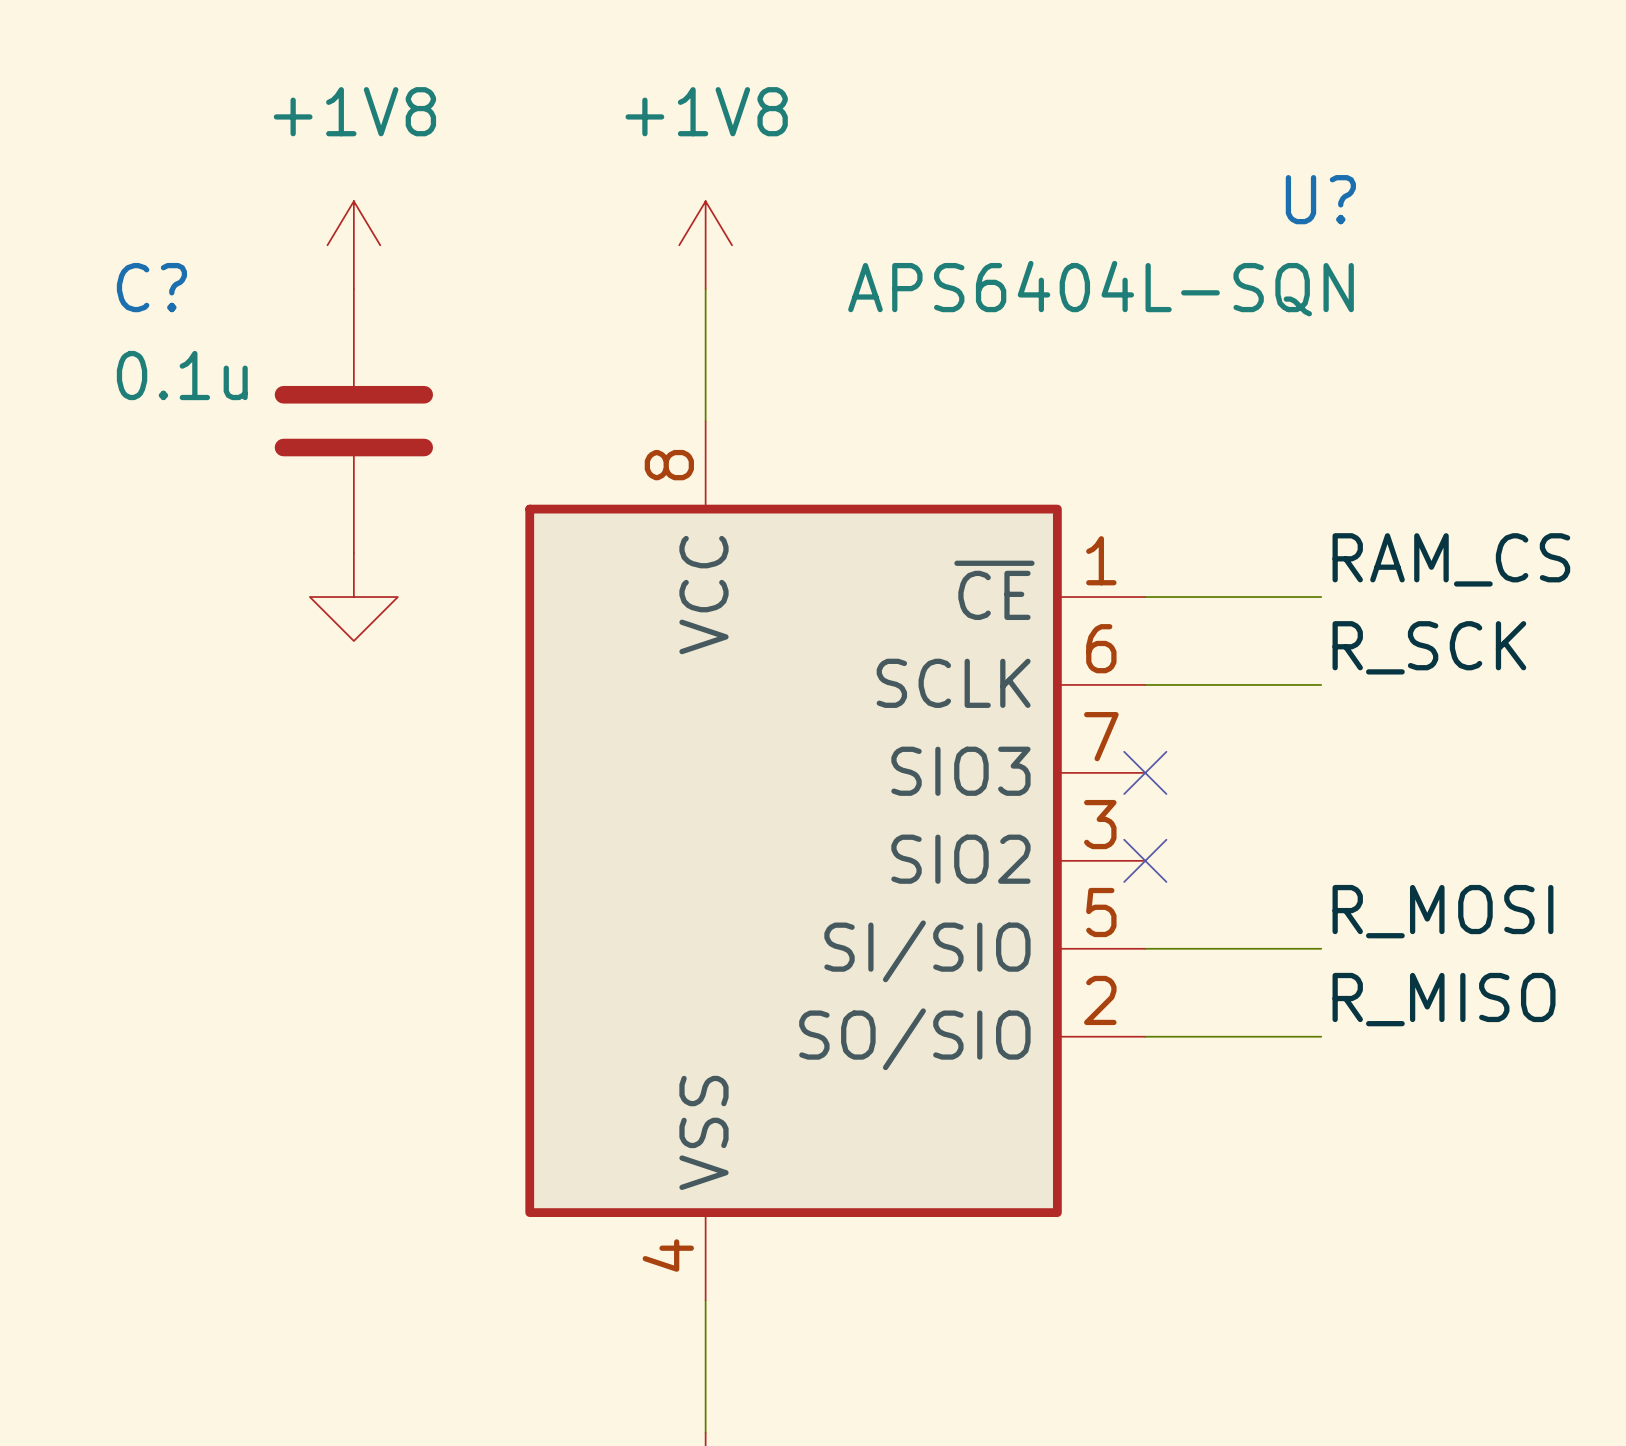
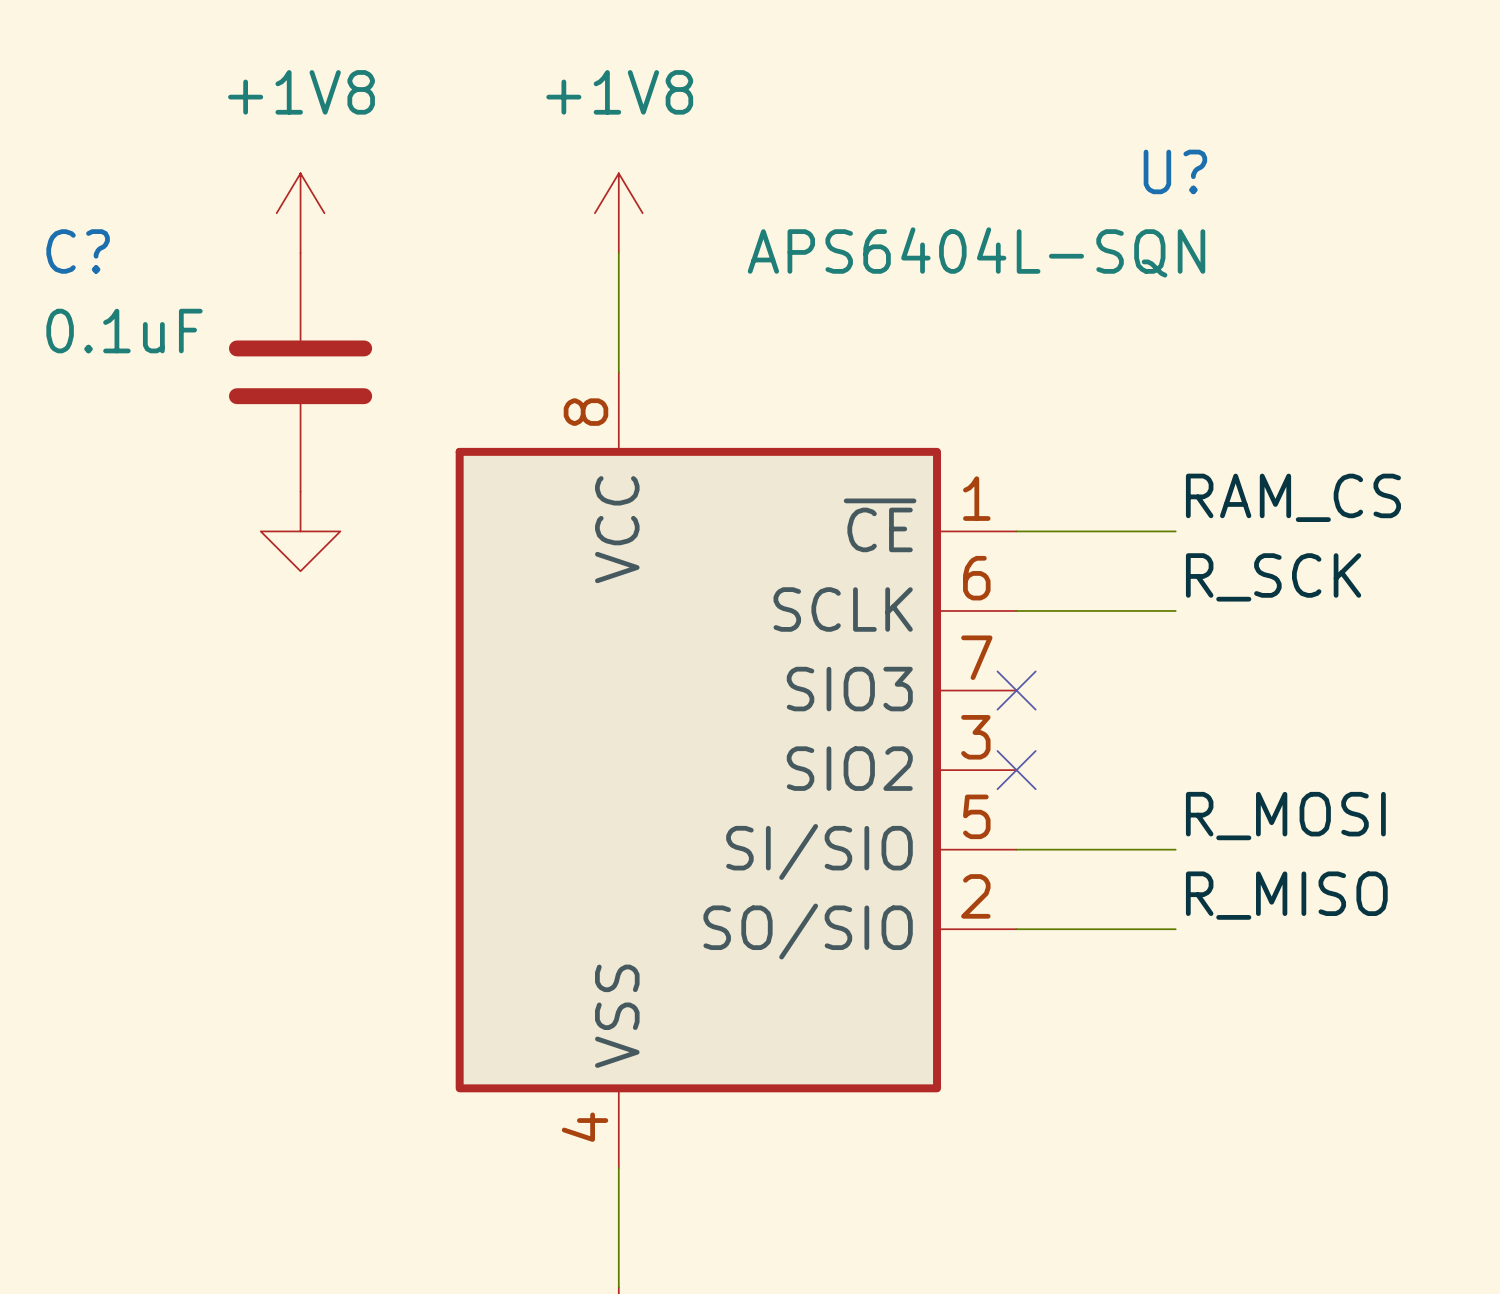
C? name position: C? (151, 287) -> C? (78, 251)
C? value: 0.1u (182, 375) -> 0.1uF (124, 331)

